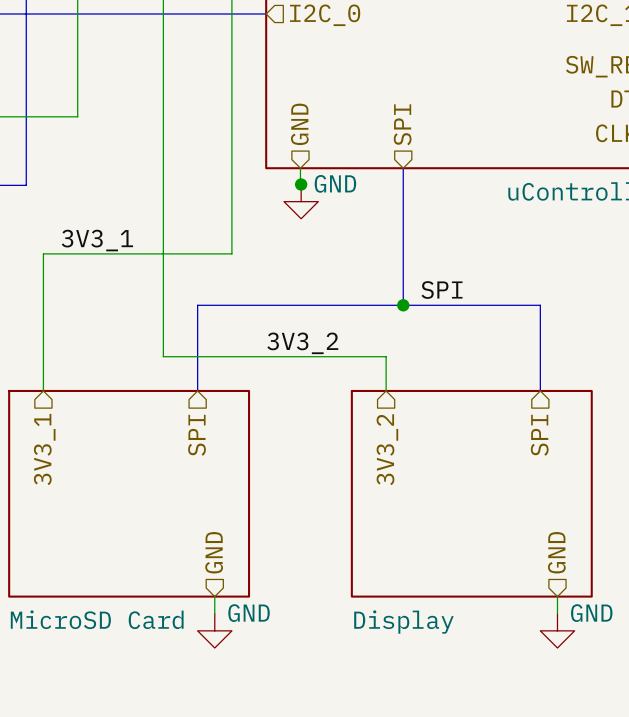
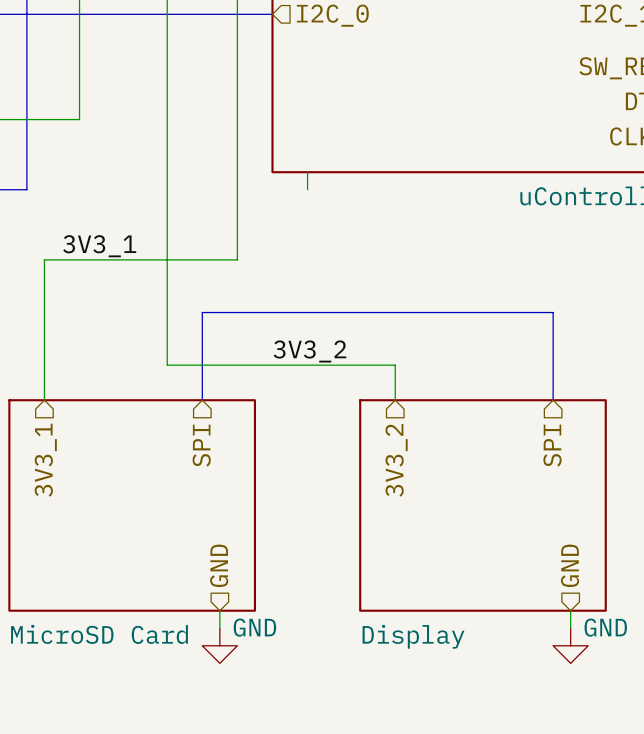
hierarchical label: GND (299, 124) -> none
hierarchical label: SPI (402, 124) -> none
bus: (403, 168) (403, 305) -> none
junction: (301, 184) -> none
power symbol: GND (301, 201) -> none
label: SPI (442, 290) -> none
junction: (403, 305) -> none

